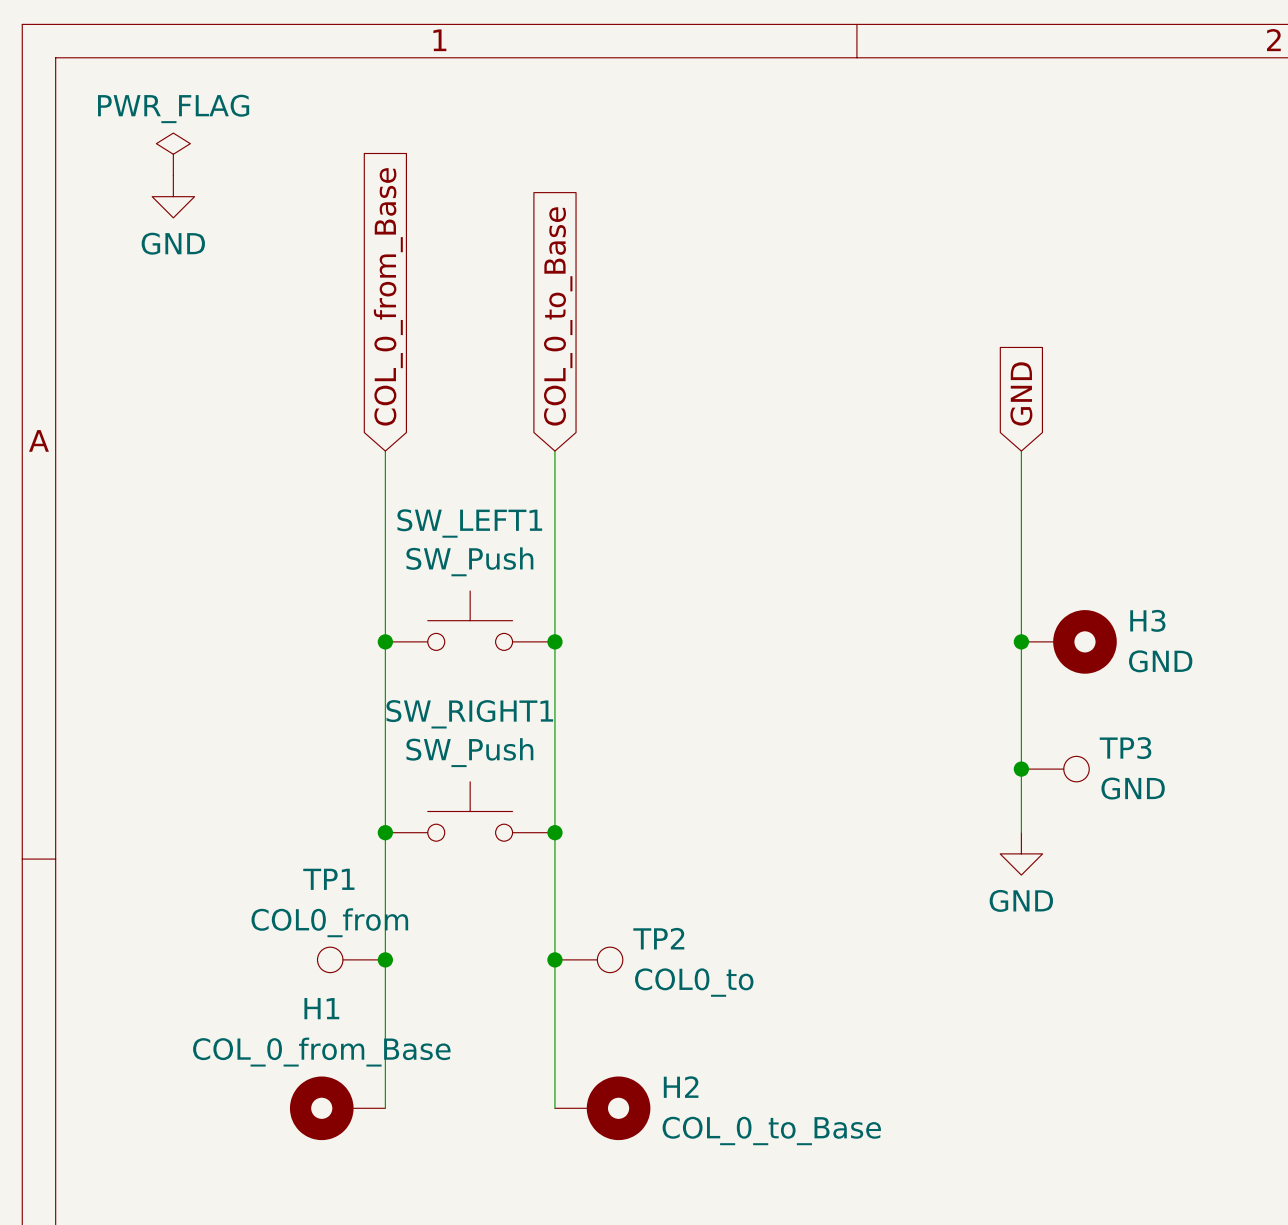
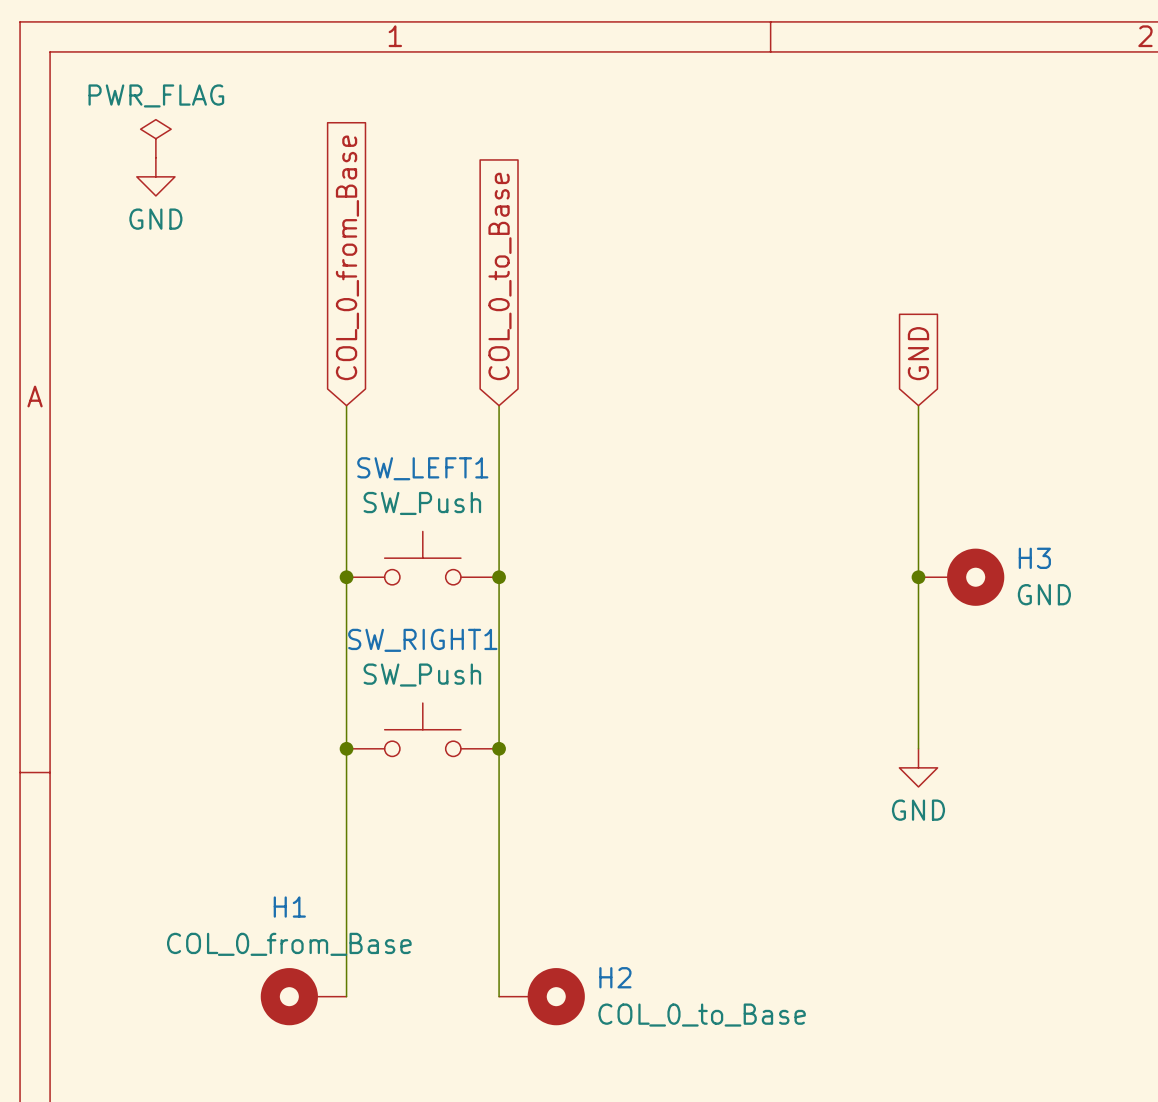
junction: (1021, 769) -> none
TP3: GND (1055, 769) -> none
TP1: COL0_from (351, 959) -> none
junction: (385, 959) -> none
junction: (554, 959) -> none
TP2: COL0_to (588, 959) -> none

